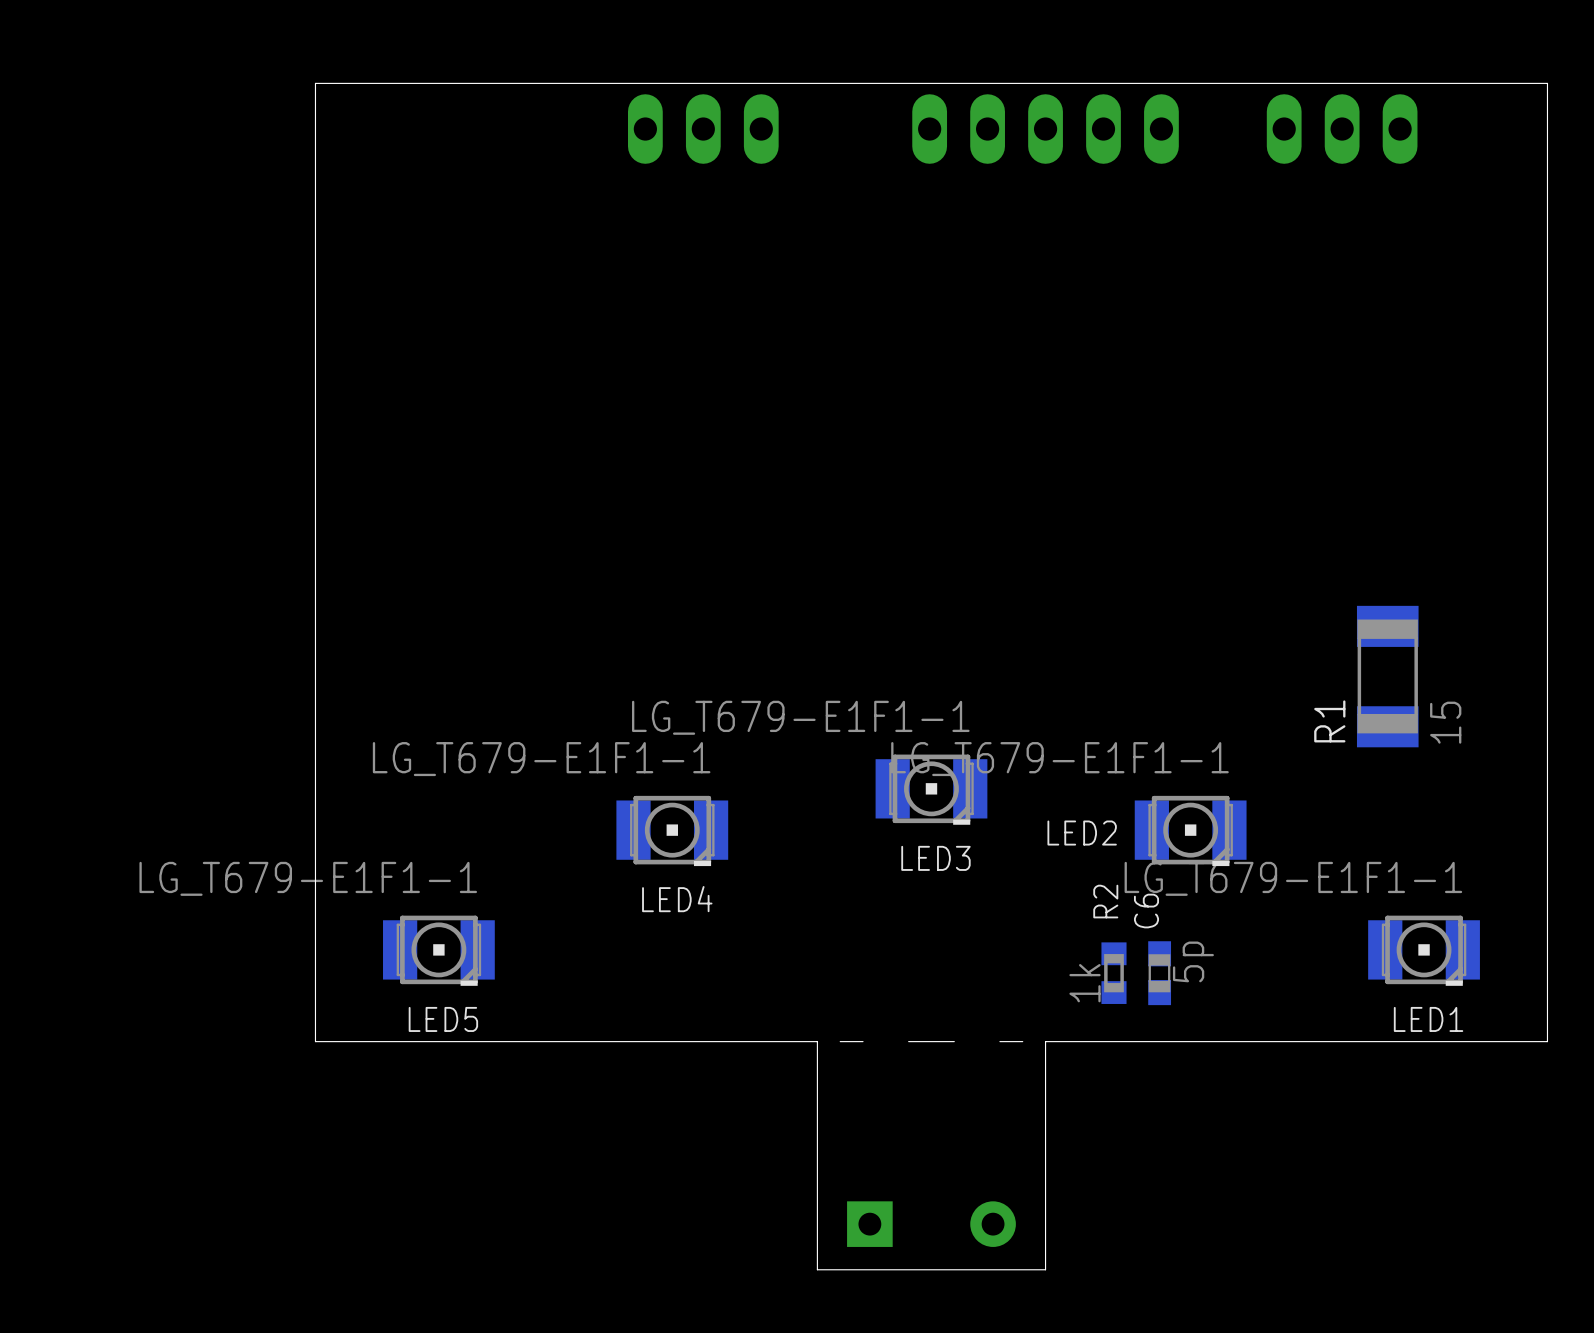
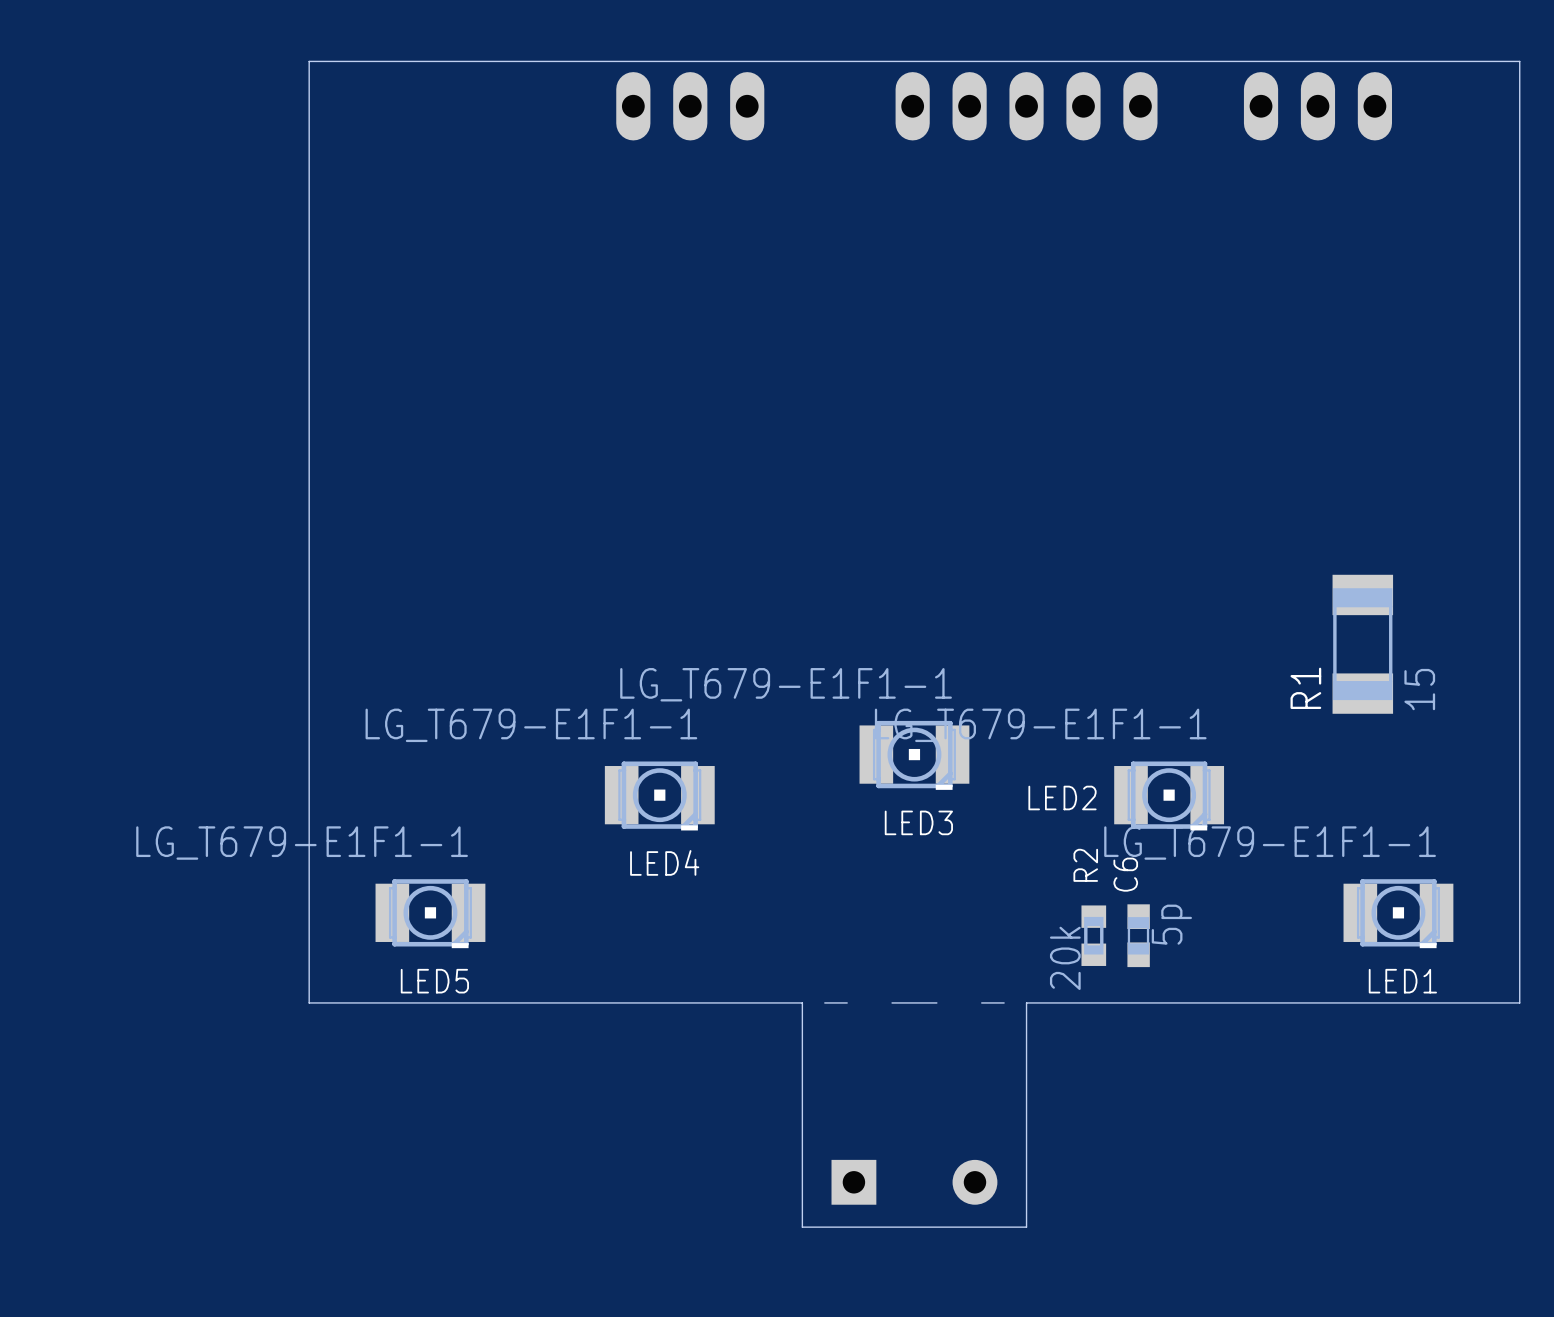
R2 value: 1k (1085, 983) -> 20k (1065, 958)

